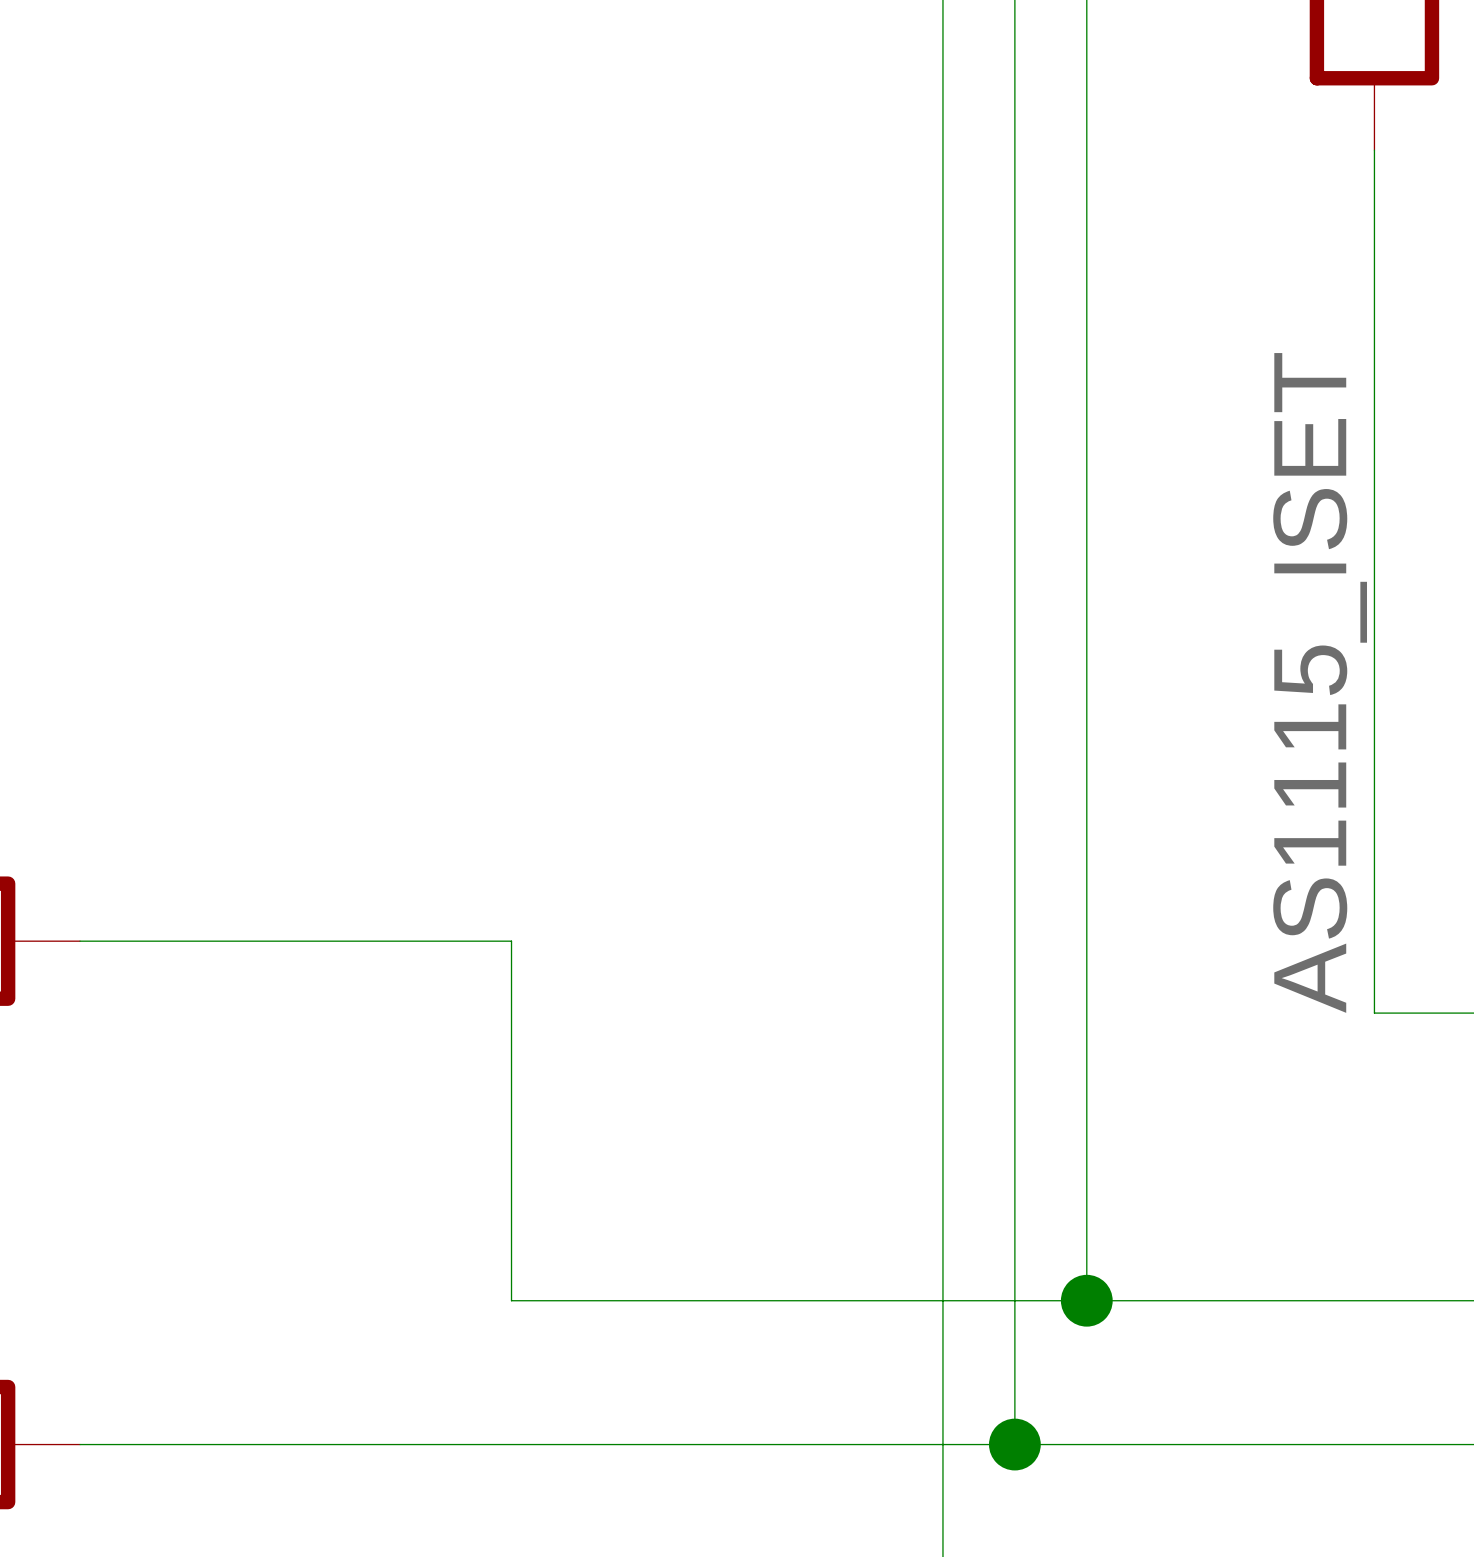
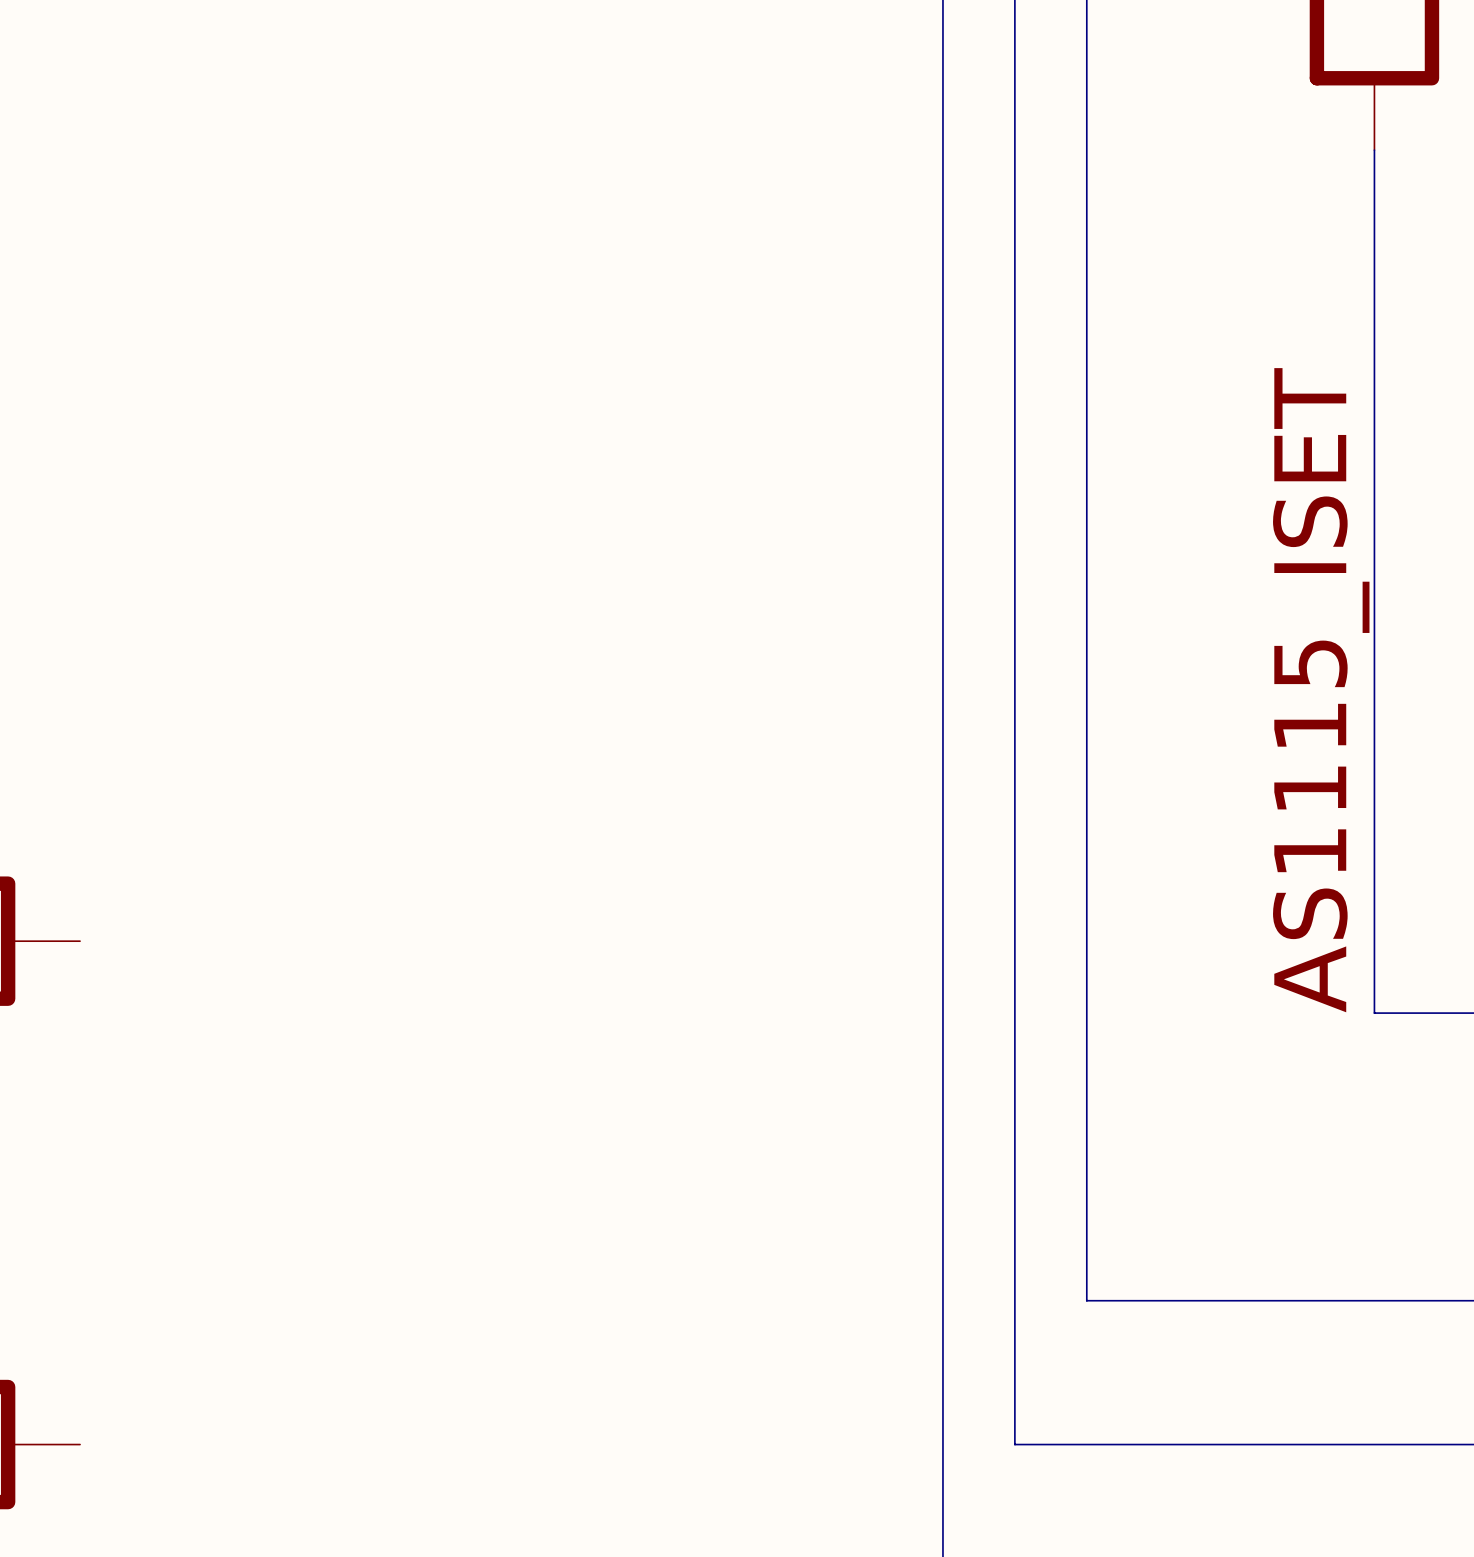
wire: (80, 941) (511, 941) (511, 1300) (1086, 1300) -> none
junction: (1086, 1300) -> none
wire: (80, 1444) (1014, 1444) -> none
junction: (1014, 1444) -> none

